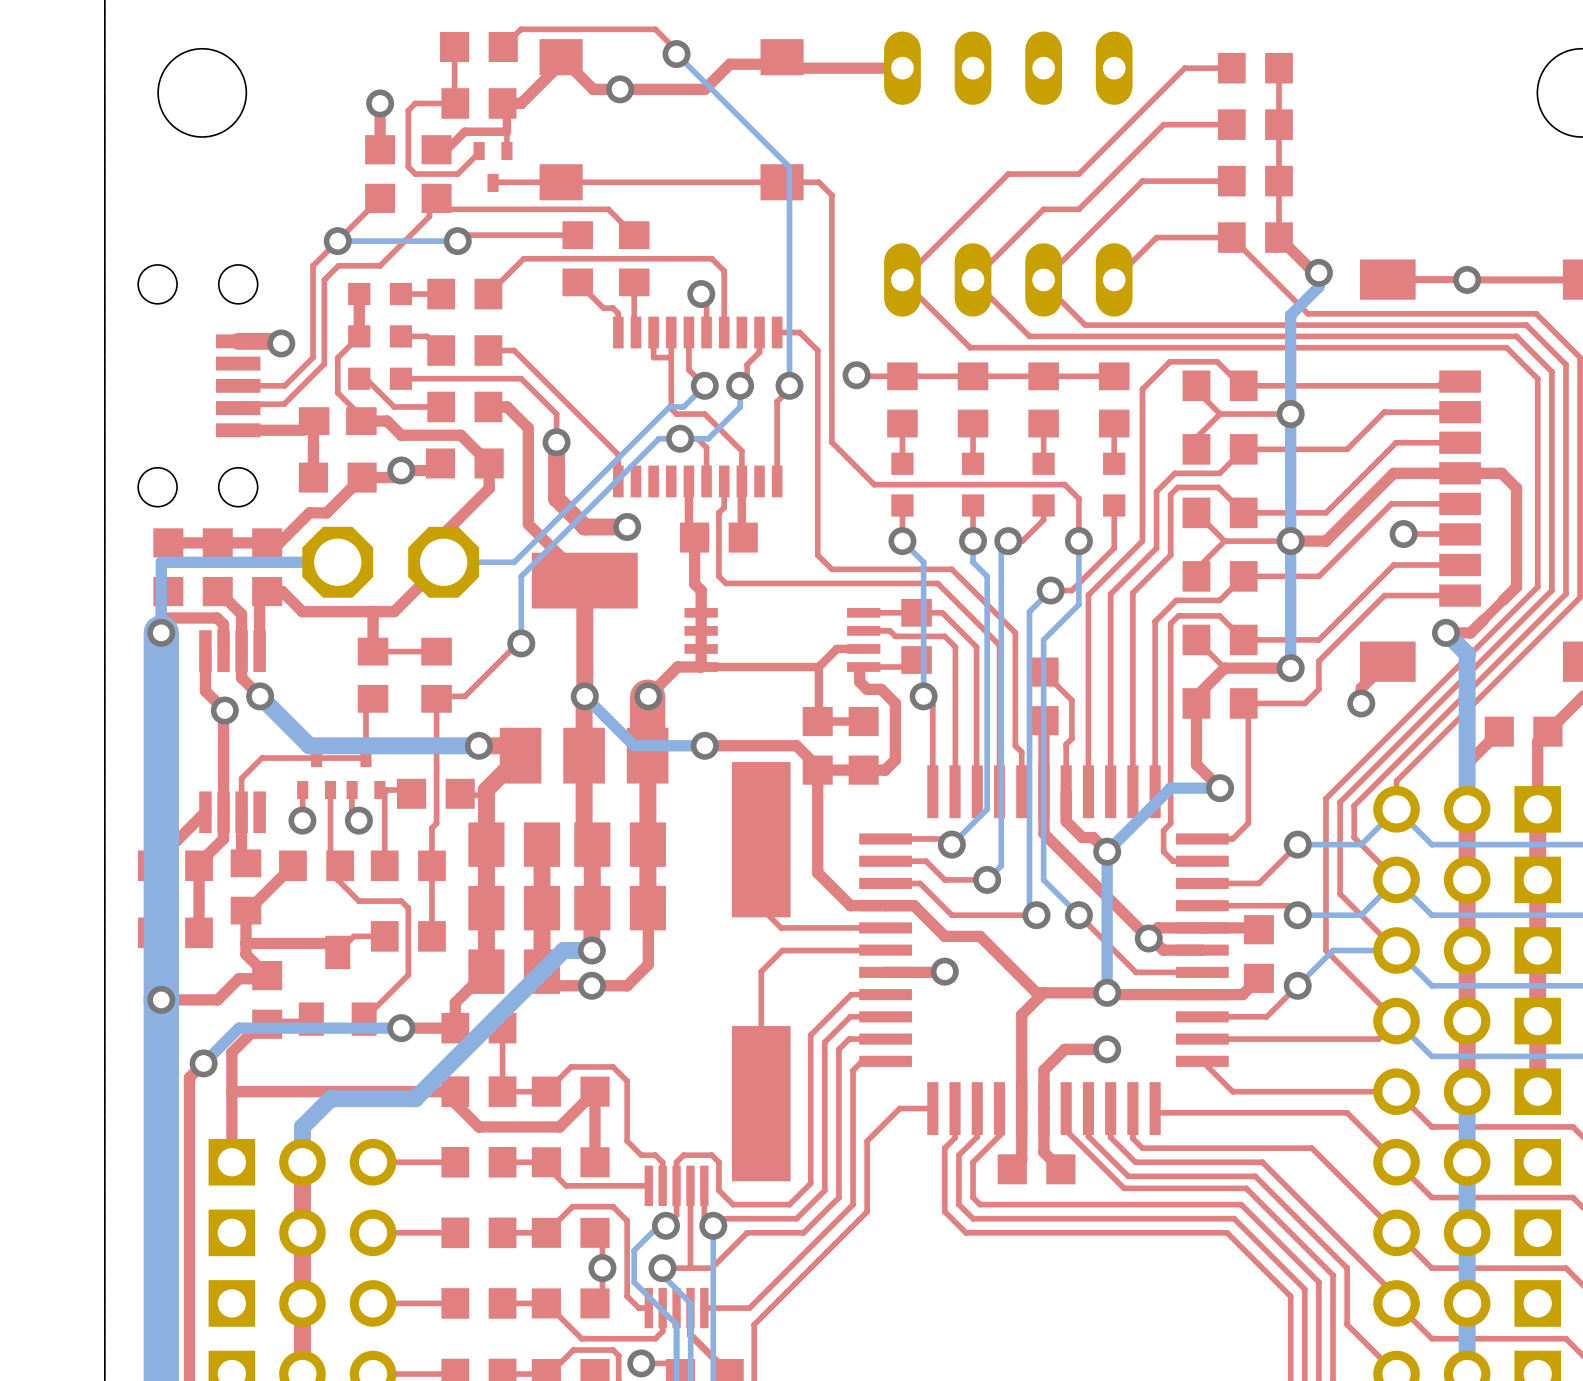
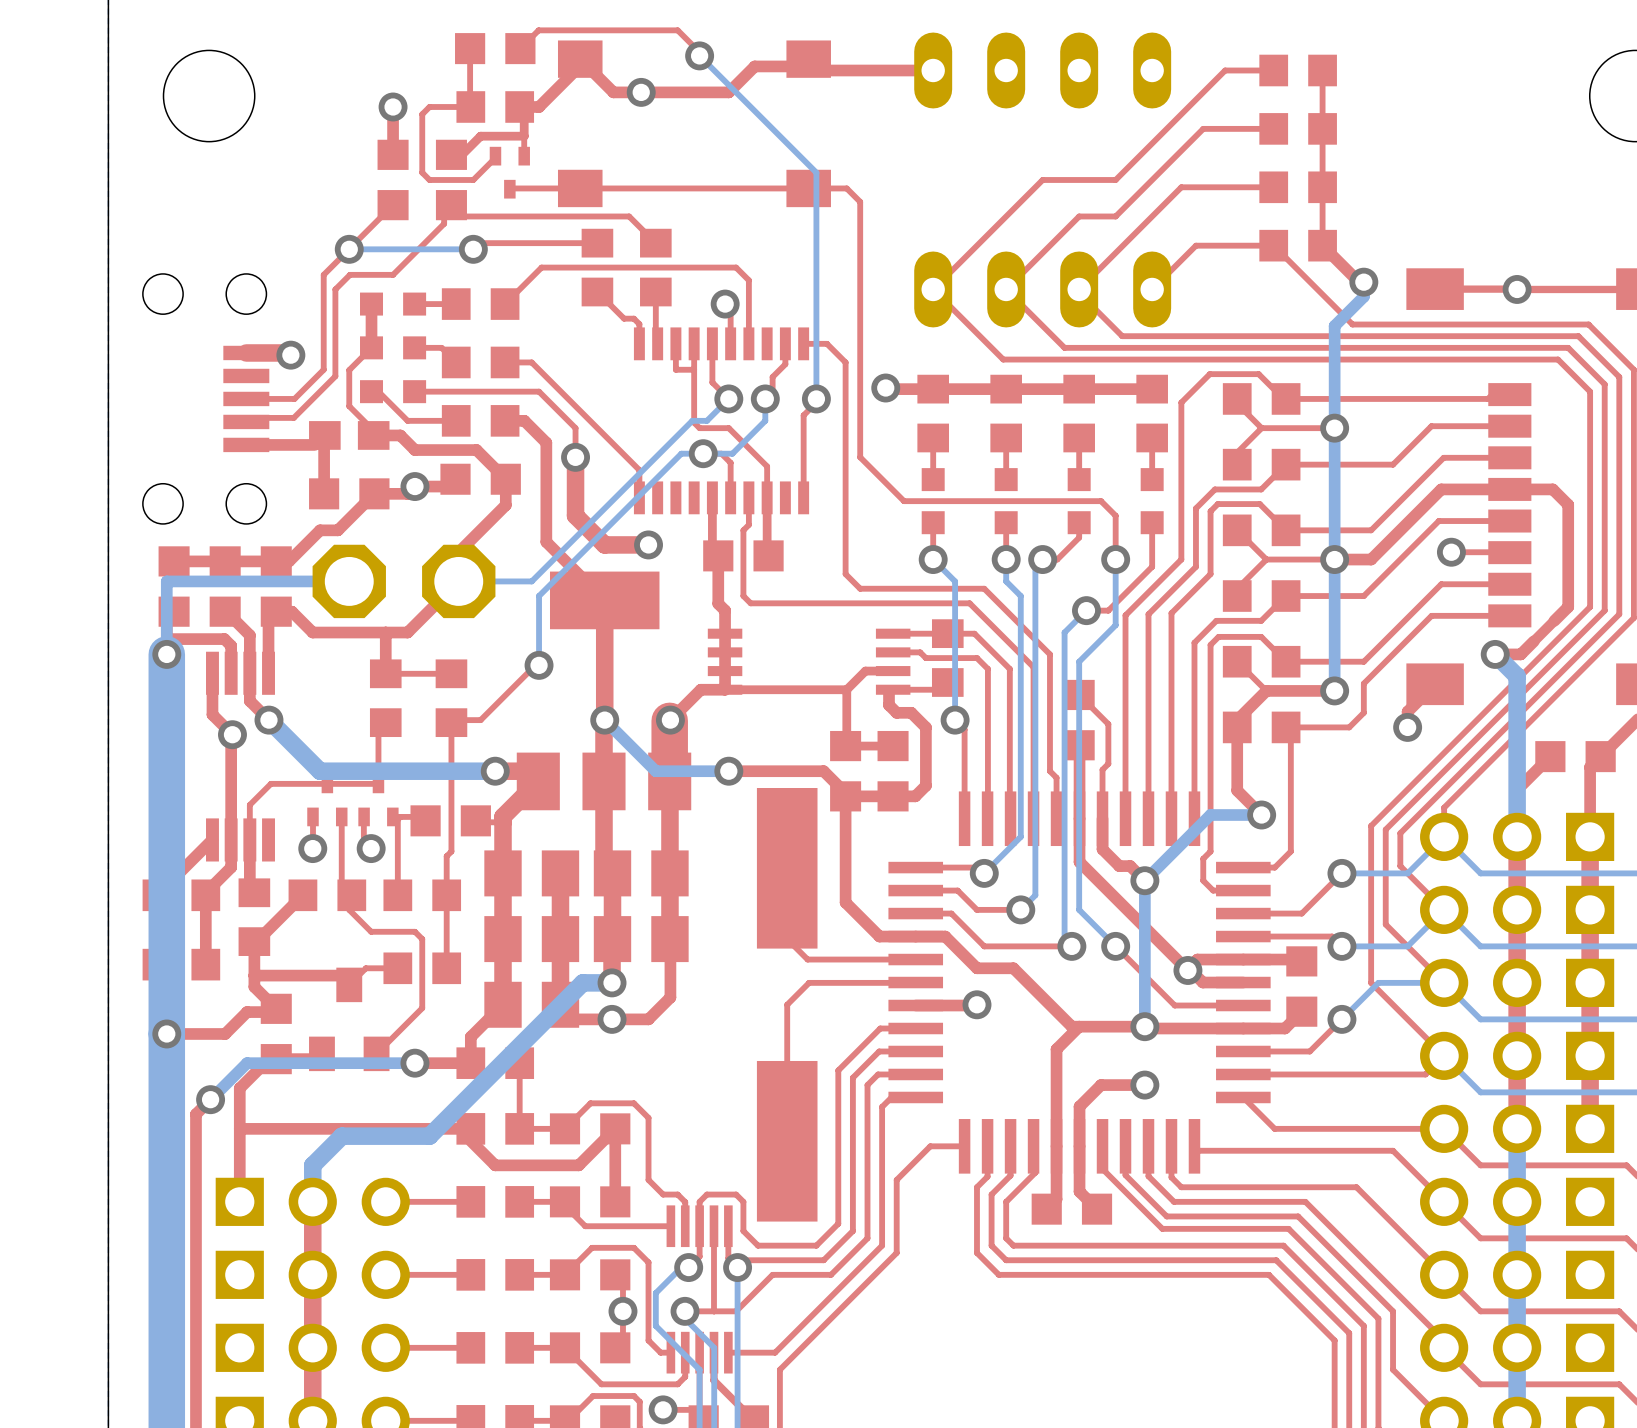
top track width: thin (1114, 376) (857, 376) -> thick (1152, 389) (886, 389)

